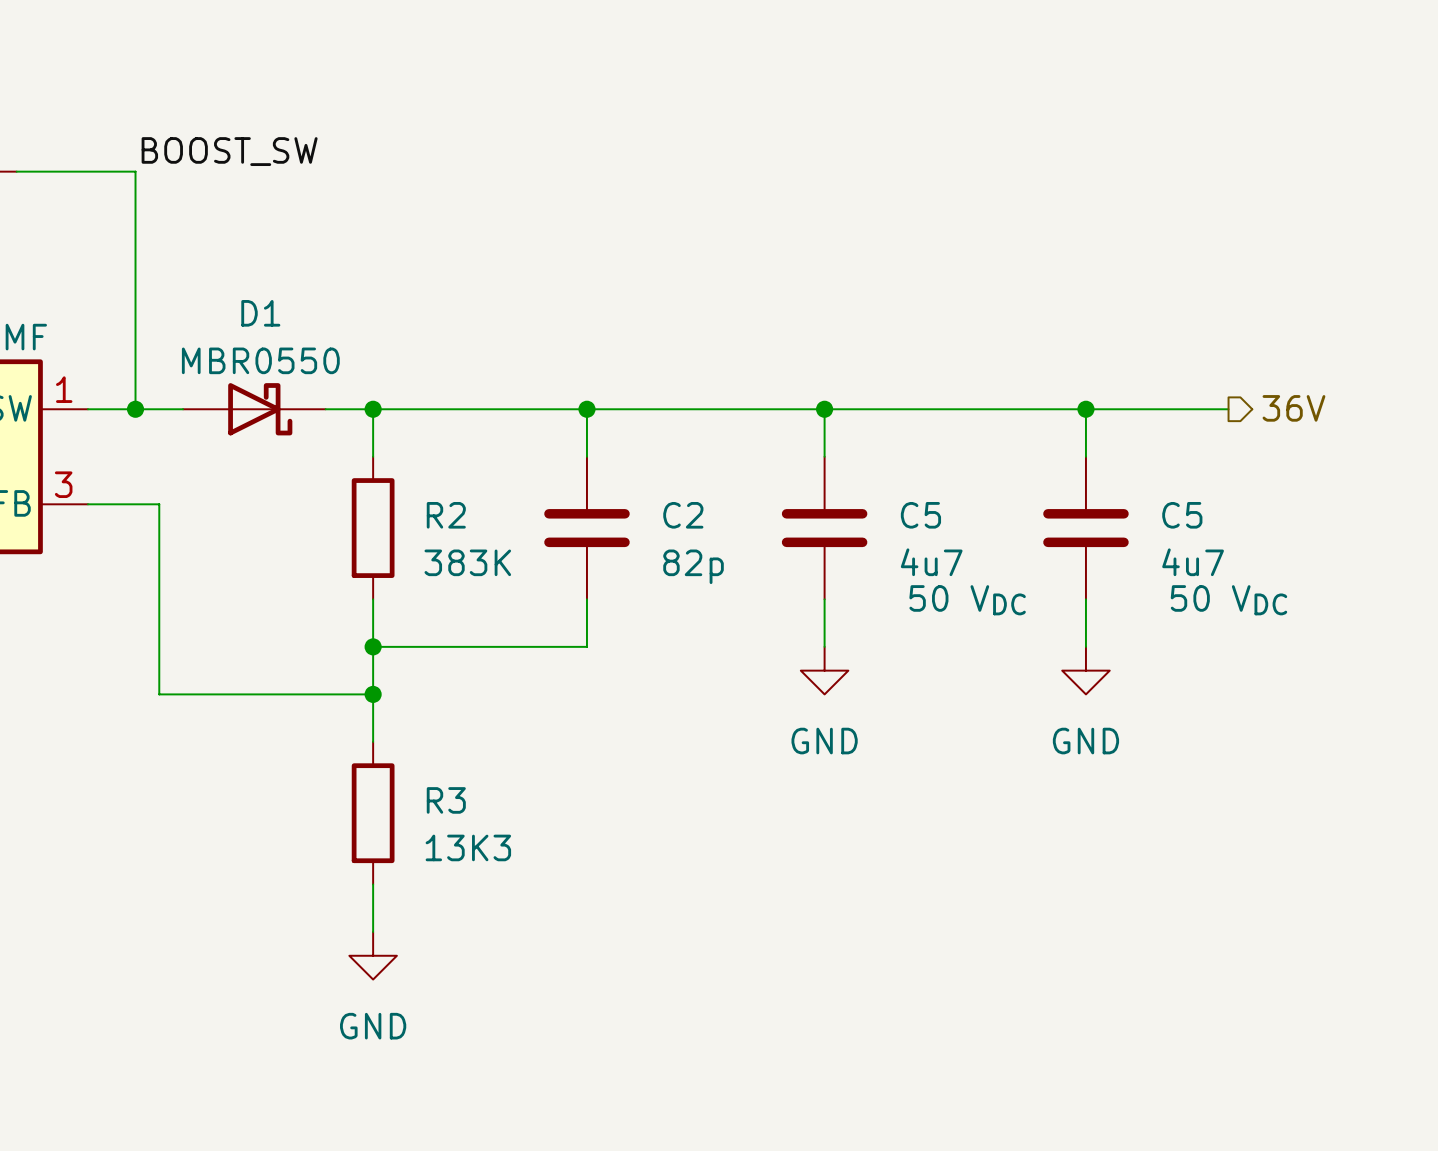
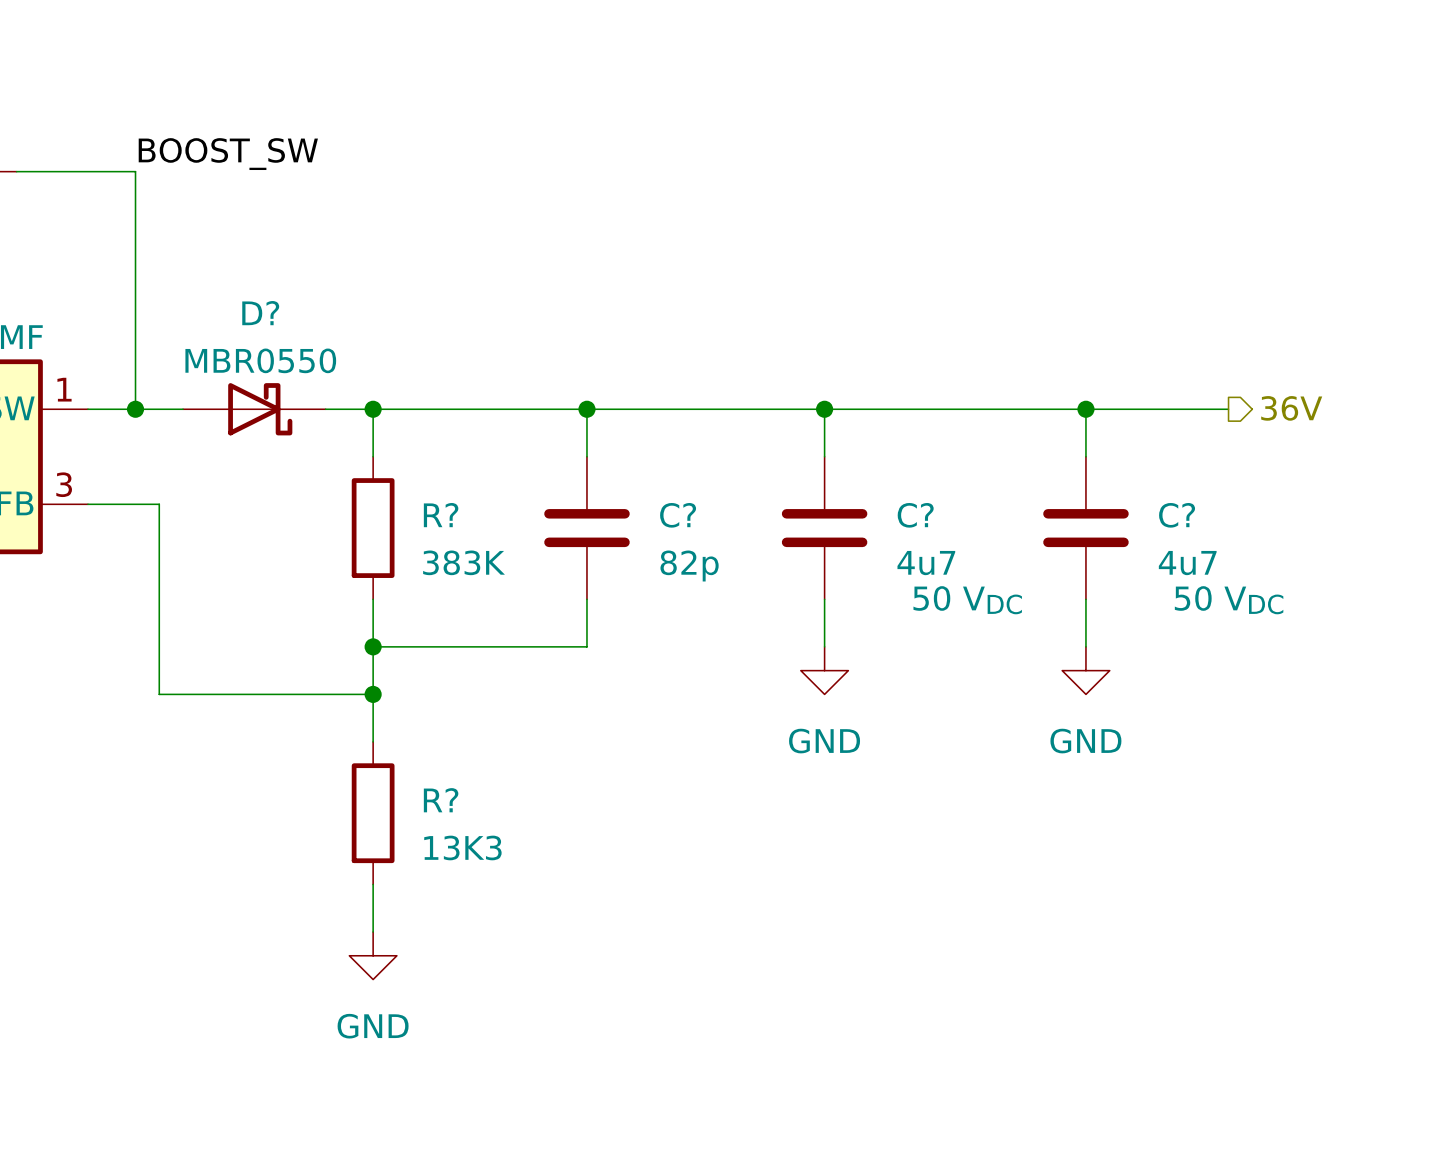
D1 name: D1 (260, 313) -> D? (260, 313)
R2 name: R2 (446, 515) -> R? (441, 515)
C2 name: C2 (683, 515) -> C? (678, 515)
C5 name: C5 (920, 515) -> C? (915, 515)
C5 name: C5 (1182, 515) -> C? (1177, 515)
R3 name: R3 (446, 800) -> R? (441, 800)

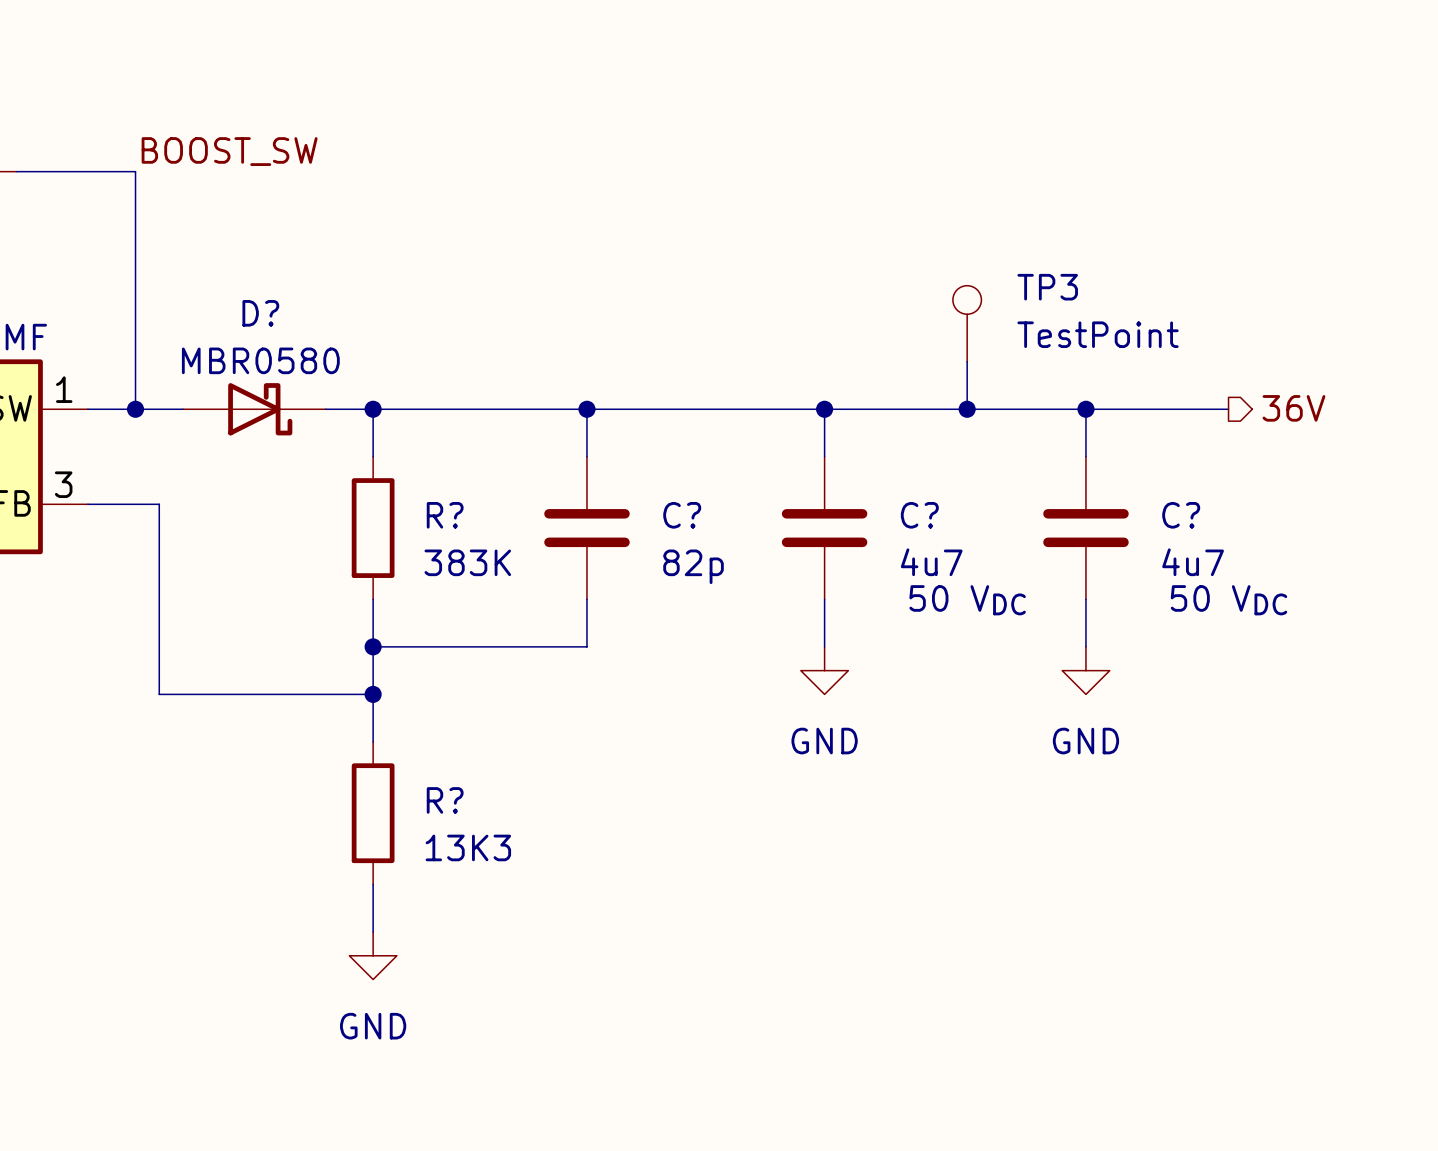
TP3: none -> TestPoint (967, 323)
D? value: MBR0550 (260, 360) -> MBR0580 (260, 360)
wire: none -> (967, 361) (967, 409)
junction: none -> (967, 409)

